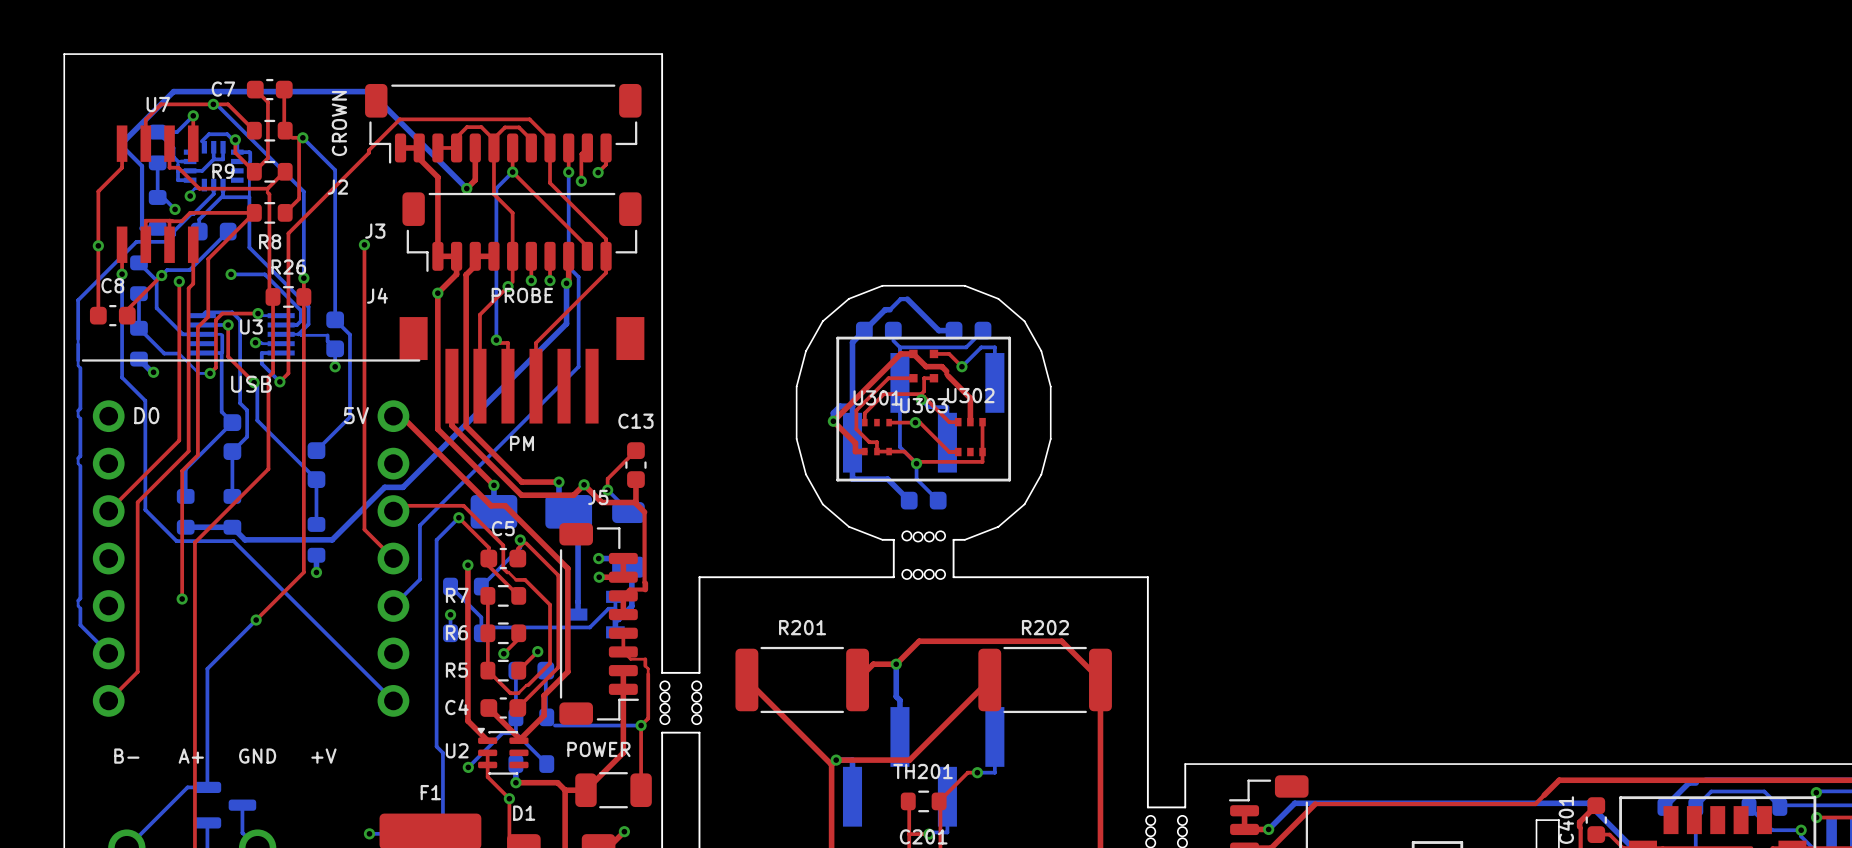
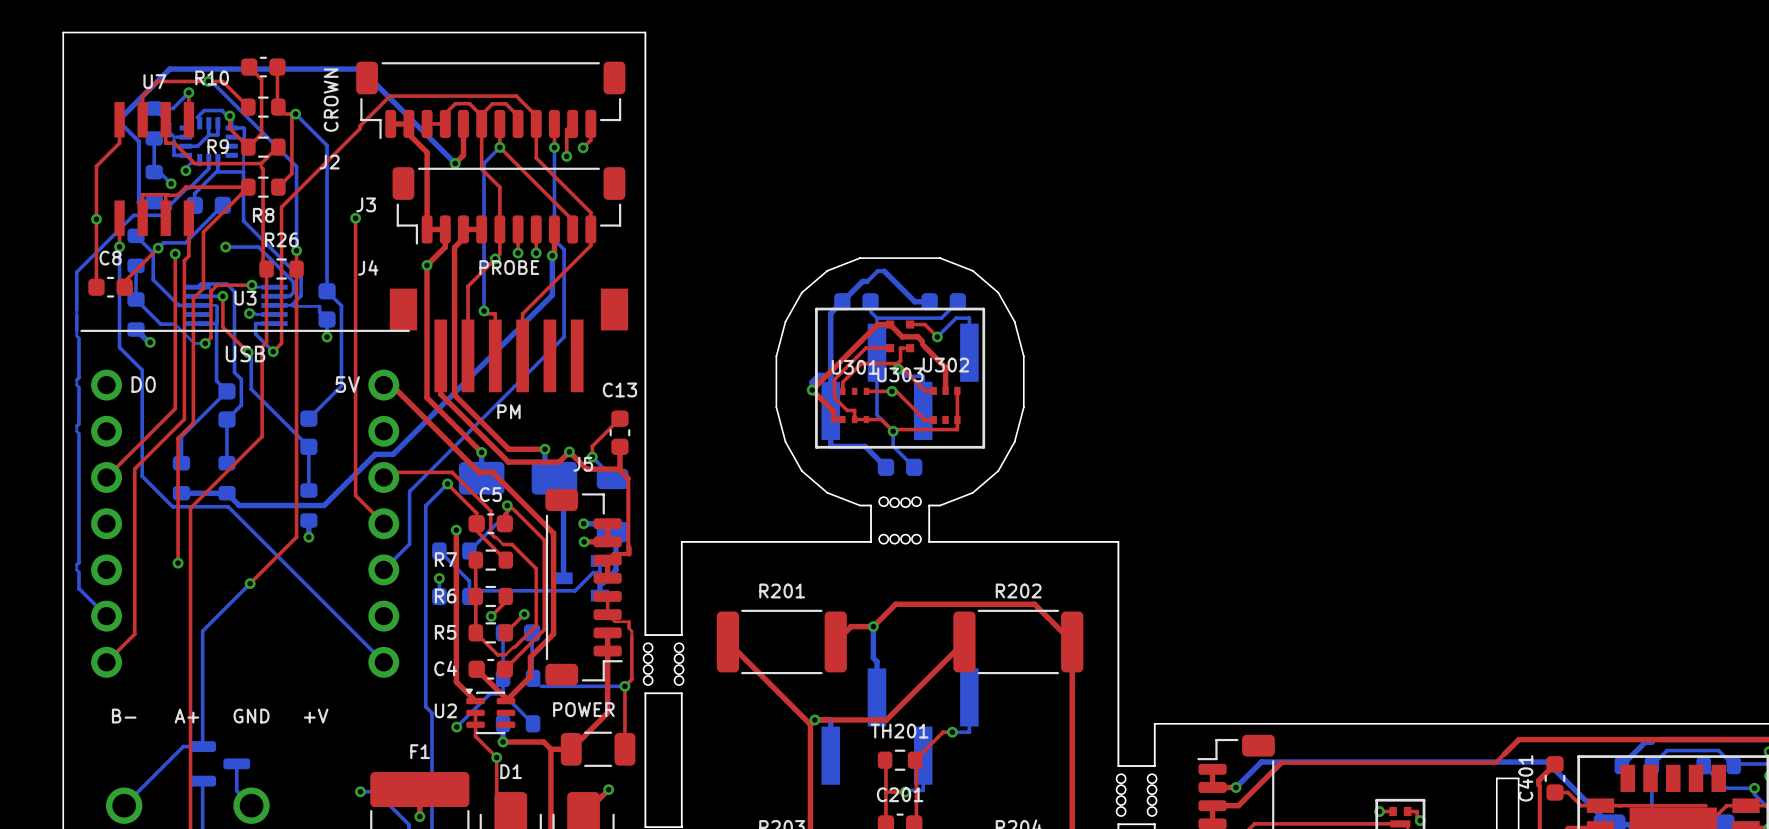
C7 name: C7 (223, 89) -> none
R10 name: none -> R10 (212, 77)

